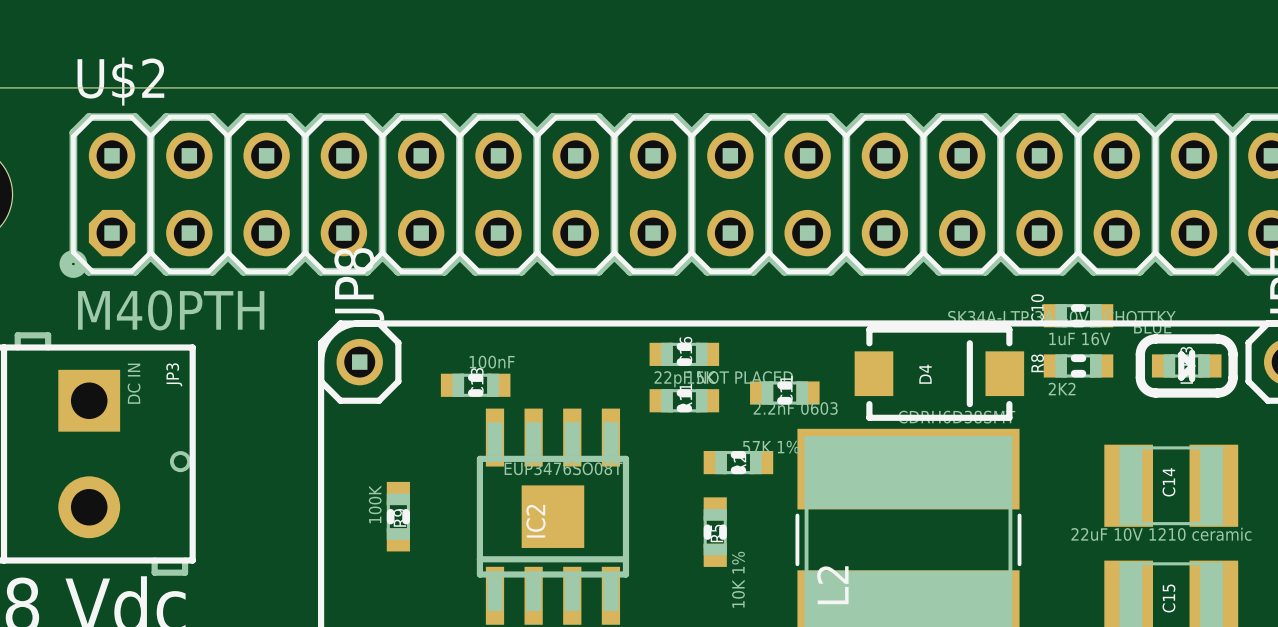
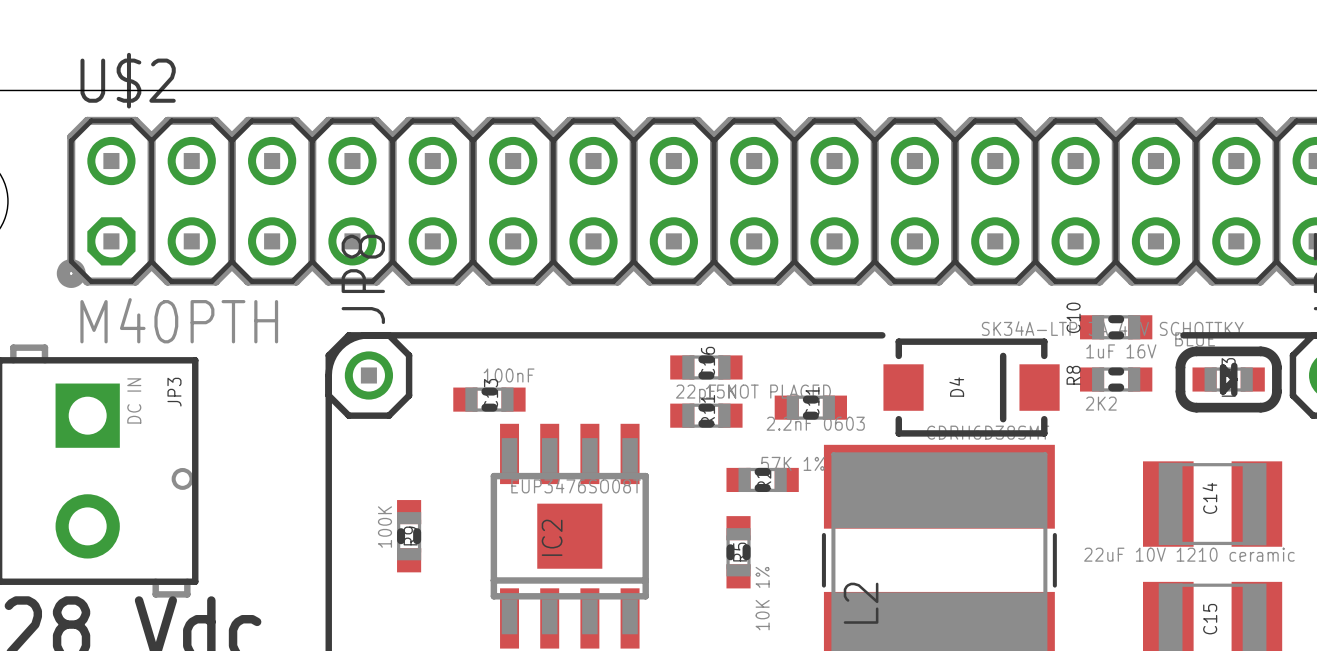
line: (853, 323) (1143, 323) -> none

